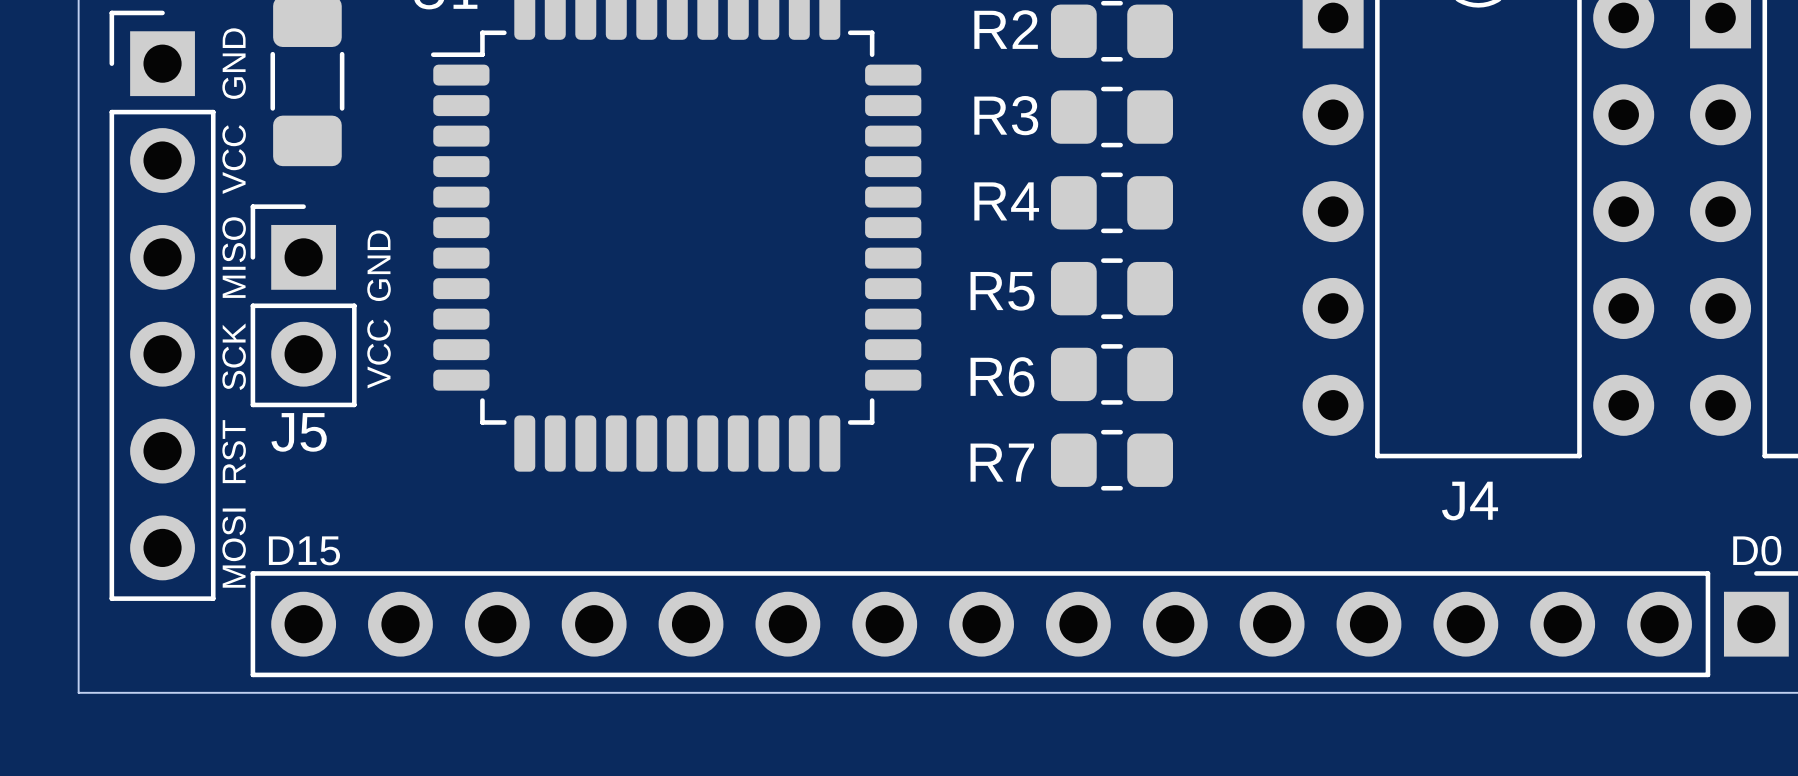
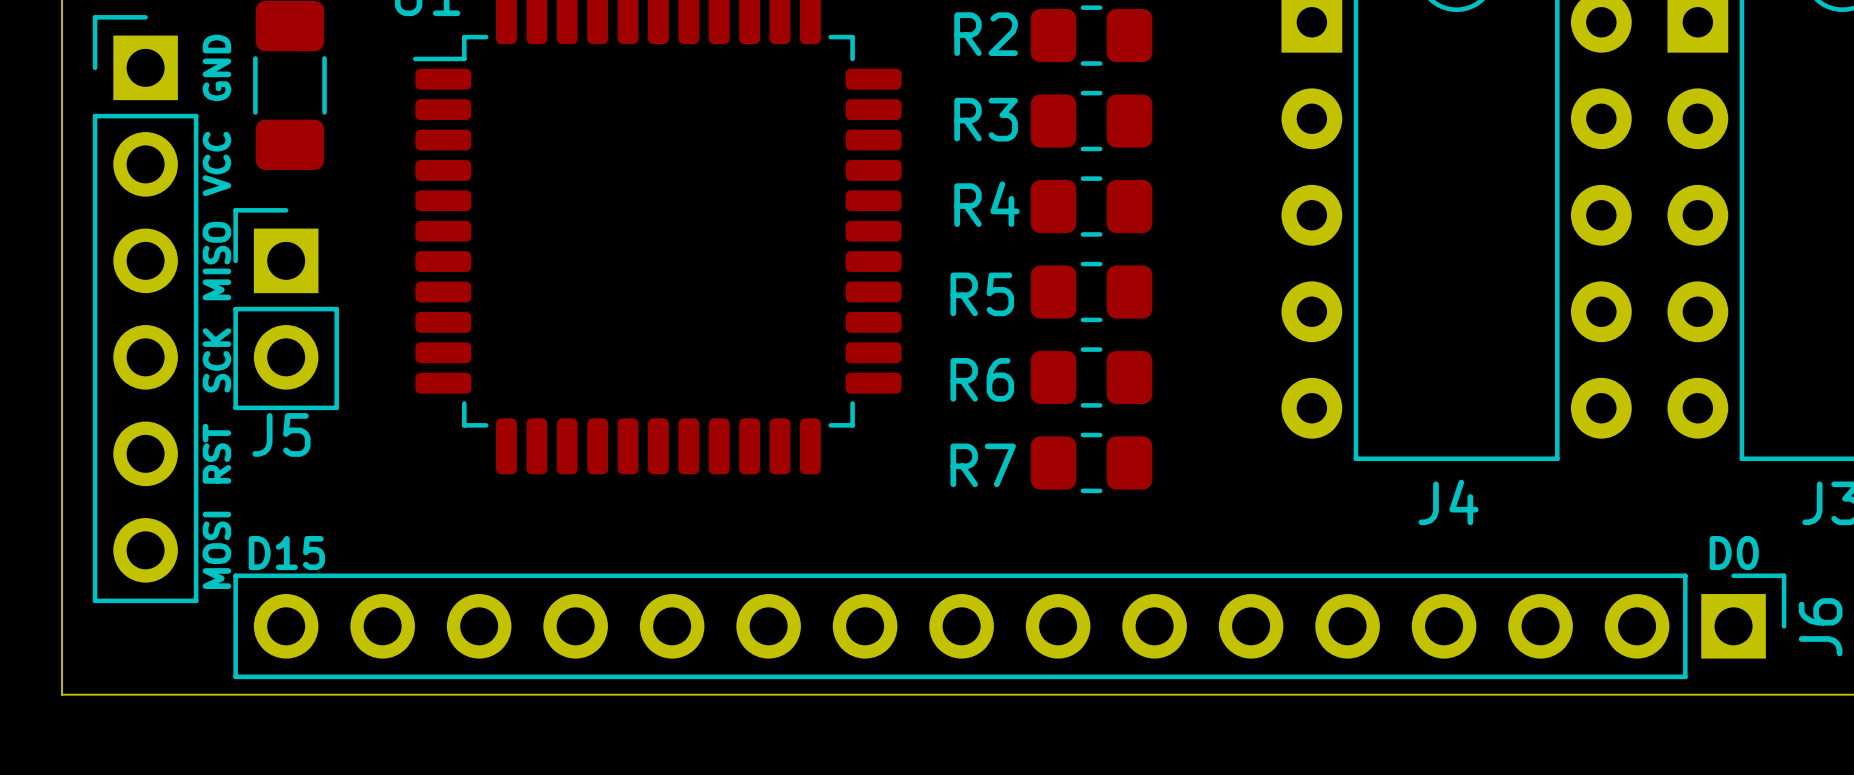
text: GND (379, 265) -> none
text: VCC (379, 354) -> none

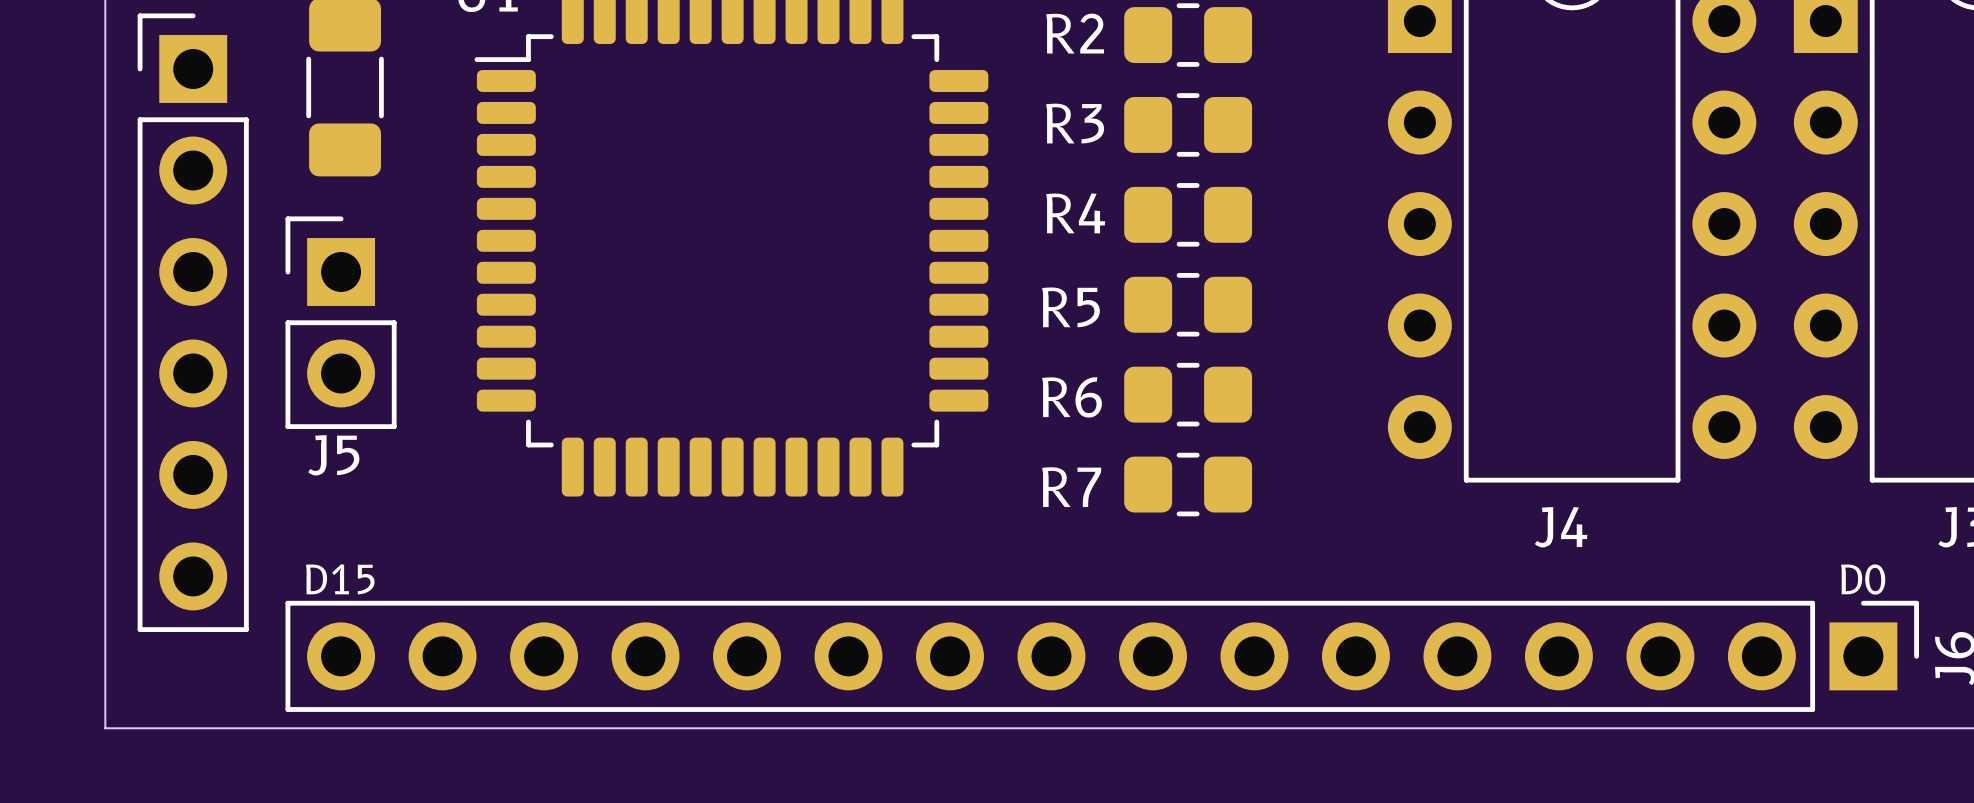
text: GND (216, 67) -> none
text: VCC (216, 163) -> none
text: MISO (216, 261) -> none
text: SCK (216, 360) -> none
text: RST (216, 453) -> none
text: MOSI (216, 550) -> none

